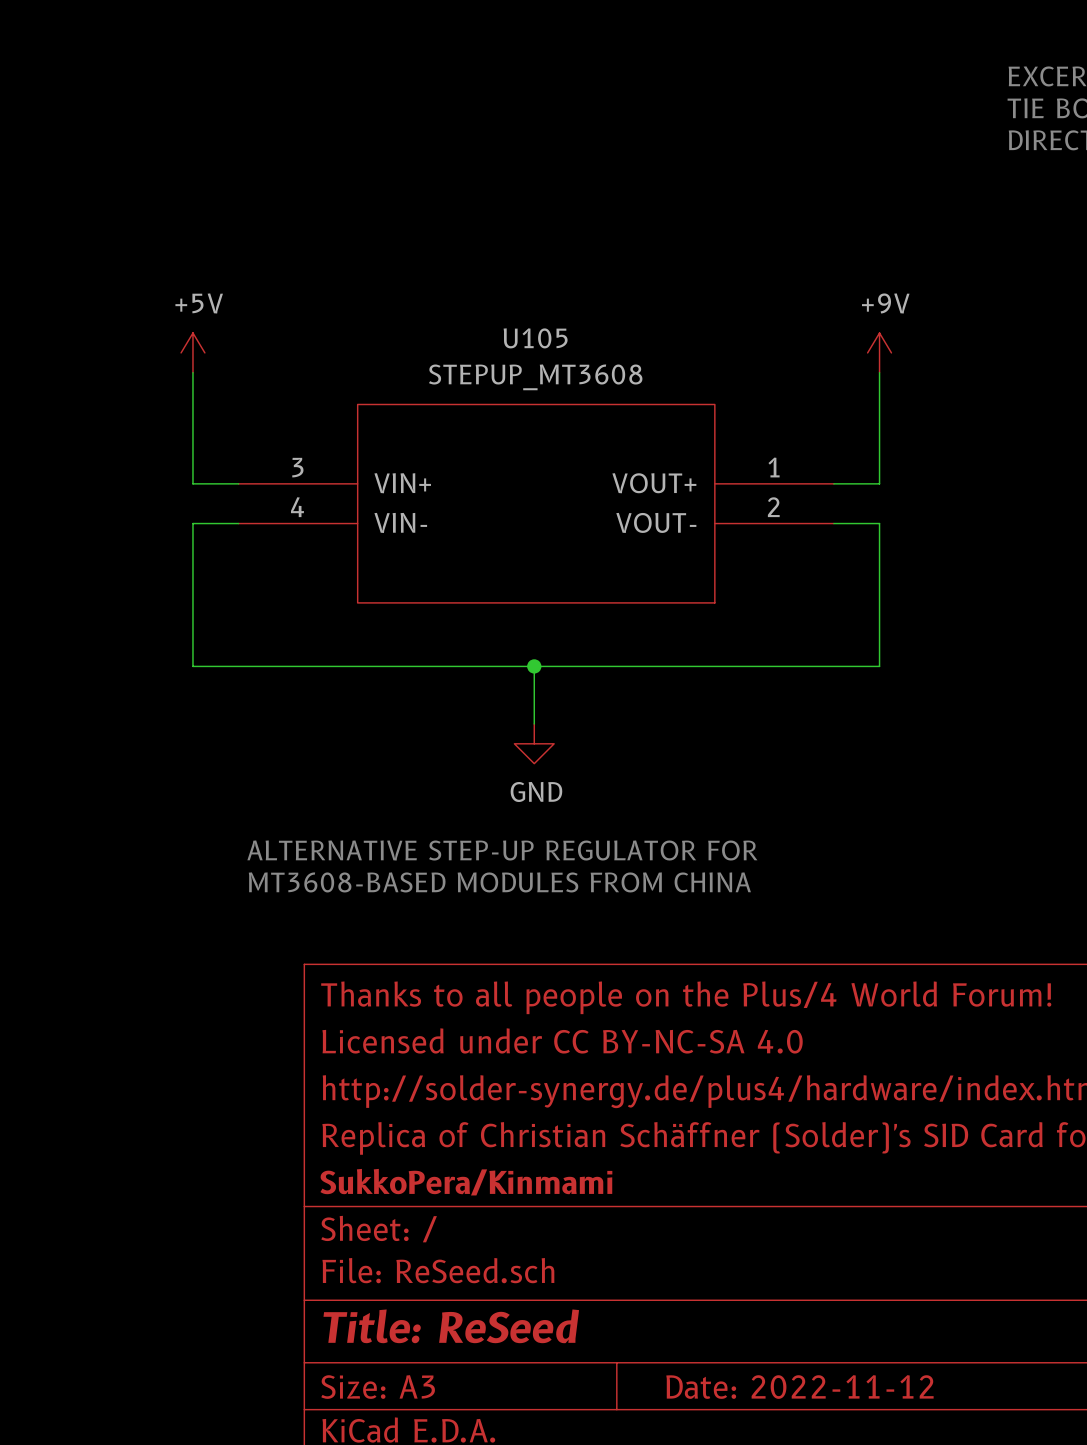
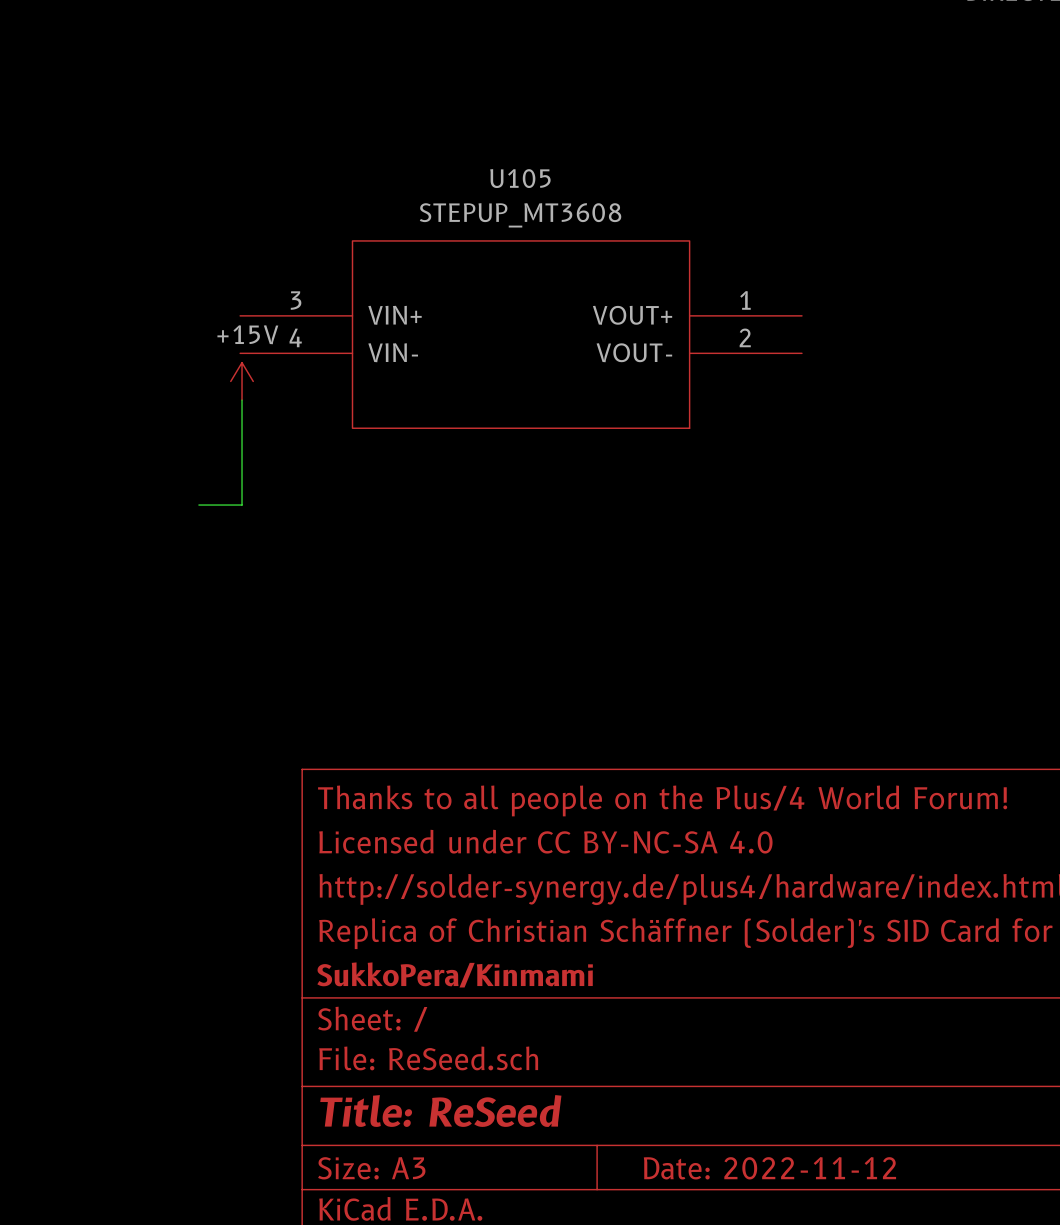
power symbol: +5V (192, 352) -> none
power symbol: +9V (879, 352) -> none
wire: (192, 372) (192, 483) (238, 483) -> none
wire: (879, 372) (879, 483) (833, 483) -> none
wire: (238, 523) (192, 523) (192, 666) (879, 666) (879, 523) (833, 523) -> none
power symbol: none -> +15V (242, 381)
wire: none -> (242, 400) (242, 505) (198, 505)
wire: (534, 666) (534, 723) -> none
junction: (534, 666) -> none
power symbol: GND (534, 743) -> none
text: ALTERNATIVE STEP-UP REGULATOR FOR (502, 850) -> none
text: MT3608-BASED MODULES FROM CHINA (499, 882) -> none

